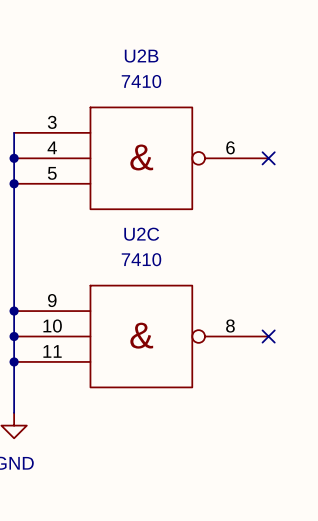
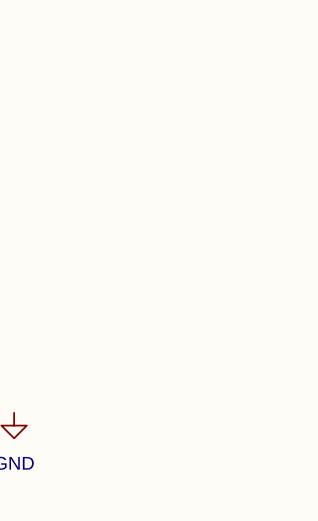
wire: (14, 132) (14, 412) -> none
junction: (14, 158) -> none
U2B: 7410 (141, 158) -> none
no-connect mark: (268, 158) -> none
junction: (14, 183) -> none
junction: (14, 311) -> none
junction: (14, 336) -> none
U2C: 7410 (141, 336) -> none
no-connect mark: (268, 336) -> none
junction: (14, 361) -> none

